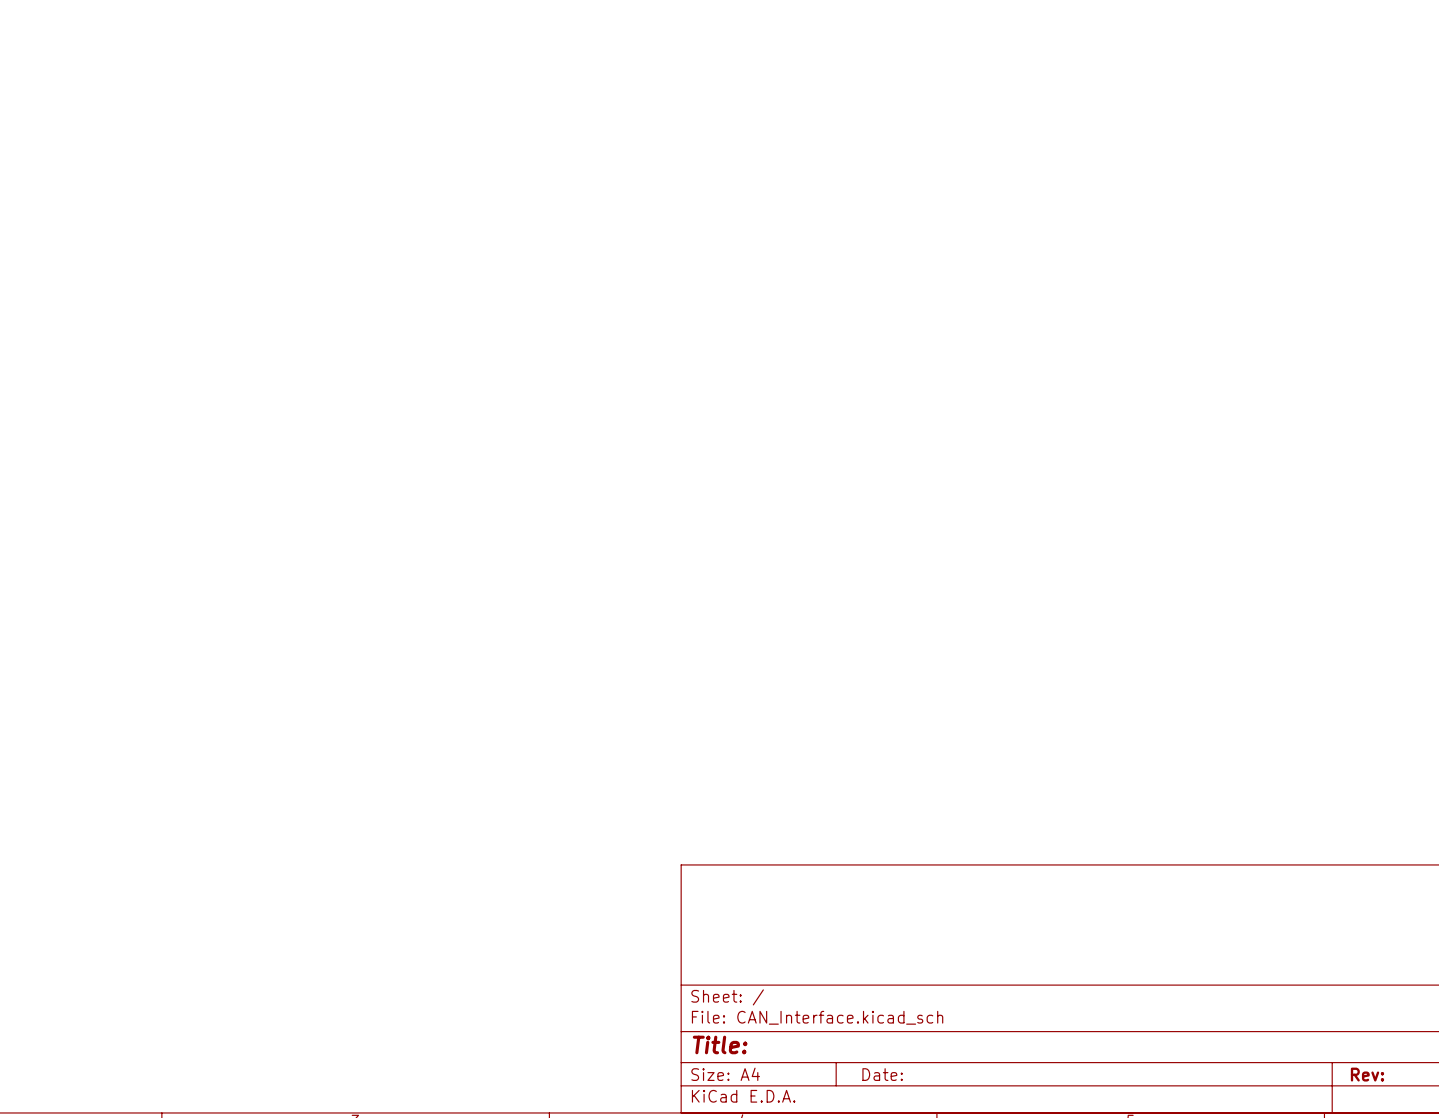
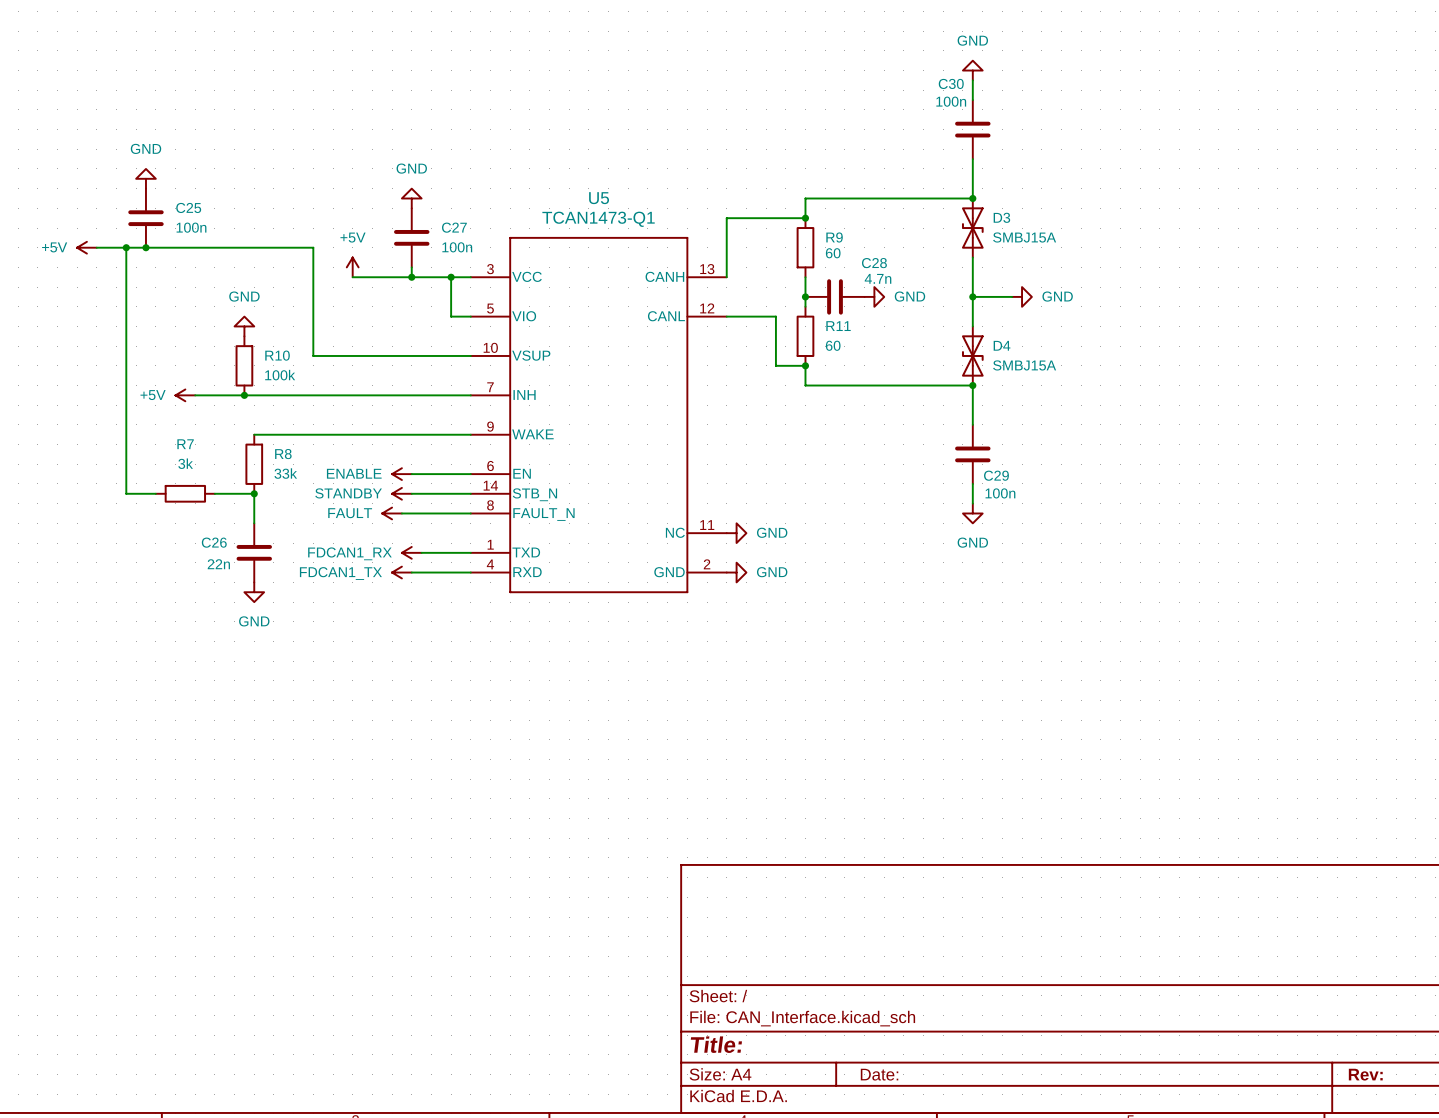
power symbol: none -> GND (972, 70)
wire: none -> (972, 80) (972, 100)
C30: none -> 100n (972, 129)
wire: none -> (972, 159) (972, 198) (805, 198) (805, 218) (726, 218) (726, 277)
power symbol: none -> GND (145, 178)
power symbol: none -> GND (411, 198)
junction: none -> (972, 198)
C25: none -> 100n (145, 218)
junction: none -> (805, 218)
D3: none -> SMBJ15A (972, 228)
C27: none -> 100n (411, 237)
power symbol: none -> +5V (86, 247)
wire: none -> (96, 247) (313, 247) (313, 355) (470, 355)
wire: none -> (126, 247) (126, 493) (155, 493)
junction: none -> (126, 247)
junction: none -> (145, 247)
R9: none -> 60 (805, 247)
wire: none -> (972, 257) (972, 326)
power symbol: none -> +5V (352, 267)
wire: none -> (411, 267) (411, 277)
wire: none -> (352, 277) (470, 277)
junction: none -> (411, 277)
wire: none -> (451, 277) (451, 316) (470, 316)
junction: none -> (451, 277)
wire: none -> (805, 277) (805, 306)
junction: none -> (805, 296)
C28: none -> 4.7n (835, 296)
power symbol: none -> GND (874, 296)
wire: none -> (972, 296) (1012, 296)
junction: none -> (972, 296)
power symbol: none -> GND (1022, 296)
wire: none -> (726, 316) (775, 316) (775, 365) (805, 365) (805, 385) (972, 385) (972, 424)
power symbol: none -> GND (244, 326)
R11: none -> 60 (805, 336)
D4: none -> SMBJ15A (972, 355)
R10: none -> 100k (244, 365)
junction: none -> (805, 365)
junction: none -> (972, 385)
power symbol: none -> +5V (185, 395)
wire: none -> (195, 395) (470, 395)
junction: none -> (244, 395)
U5: none -> TCAN1473-Q1 (598, 415)
wire: none -> (254, 434) (470, 434)
C29: none -> 100n (972, 454)
R8: none -> 33k (254, 464)
power symbol: none -> ENABLE (401, 474)
wire: none -> (411, 474) (470, 474)
wire: none -> (972, 483) (972, 503)
R7: none -> 3k (185, 493)
wire: none -> (214, 493) (254, 493) (254, 523)
junction: none -> (254, 493)
power symbol: none -> STANDBY (401, 493)
wire: none -> (411, 493) (470, 493)
power symbol: none -> FAULT (392, 513)
wire: none -> (401, 513) (470, 513)
power symbol: none -> GND (972, 513)
power symbol: none -> GND (736, 533)
C26: none -> 22n (254, 552)
power symbol: none -> FDCAN1_RX (411, 552)
wire: none -> (421, 552) (470, 552)
power symbol: none -> FDCAN1_TX (401, 572)
wire: none -> (411, 572) (470, 572)
power symbol: none -> GND (736, 572)
power symbol: none -> GND (254, 592)

